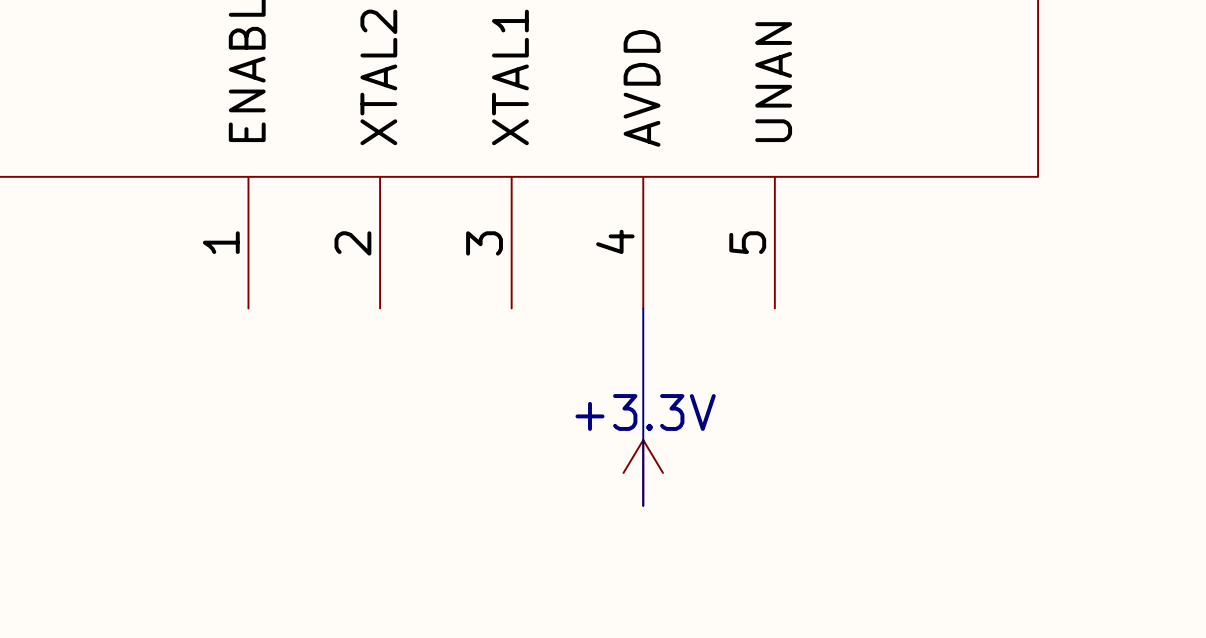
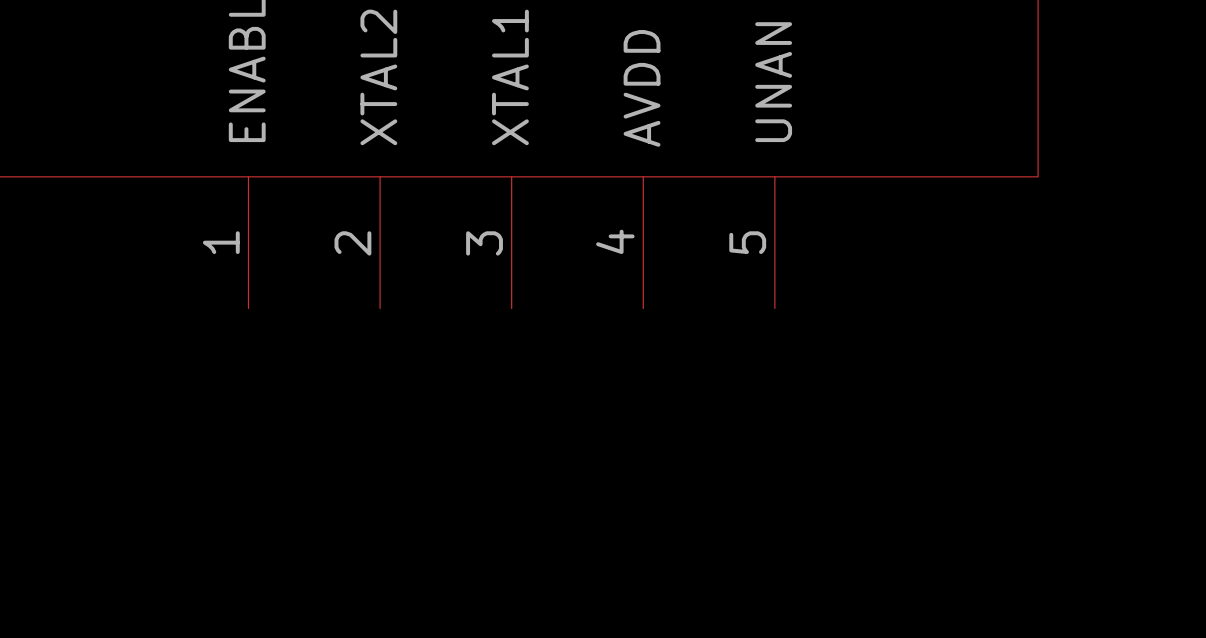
wire: (643, 308) (643, 505) -> none
power symbol: +3.3V (643, 472) -> none

